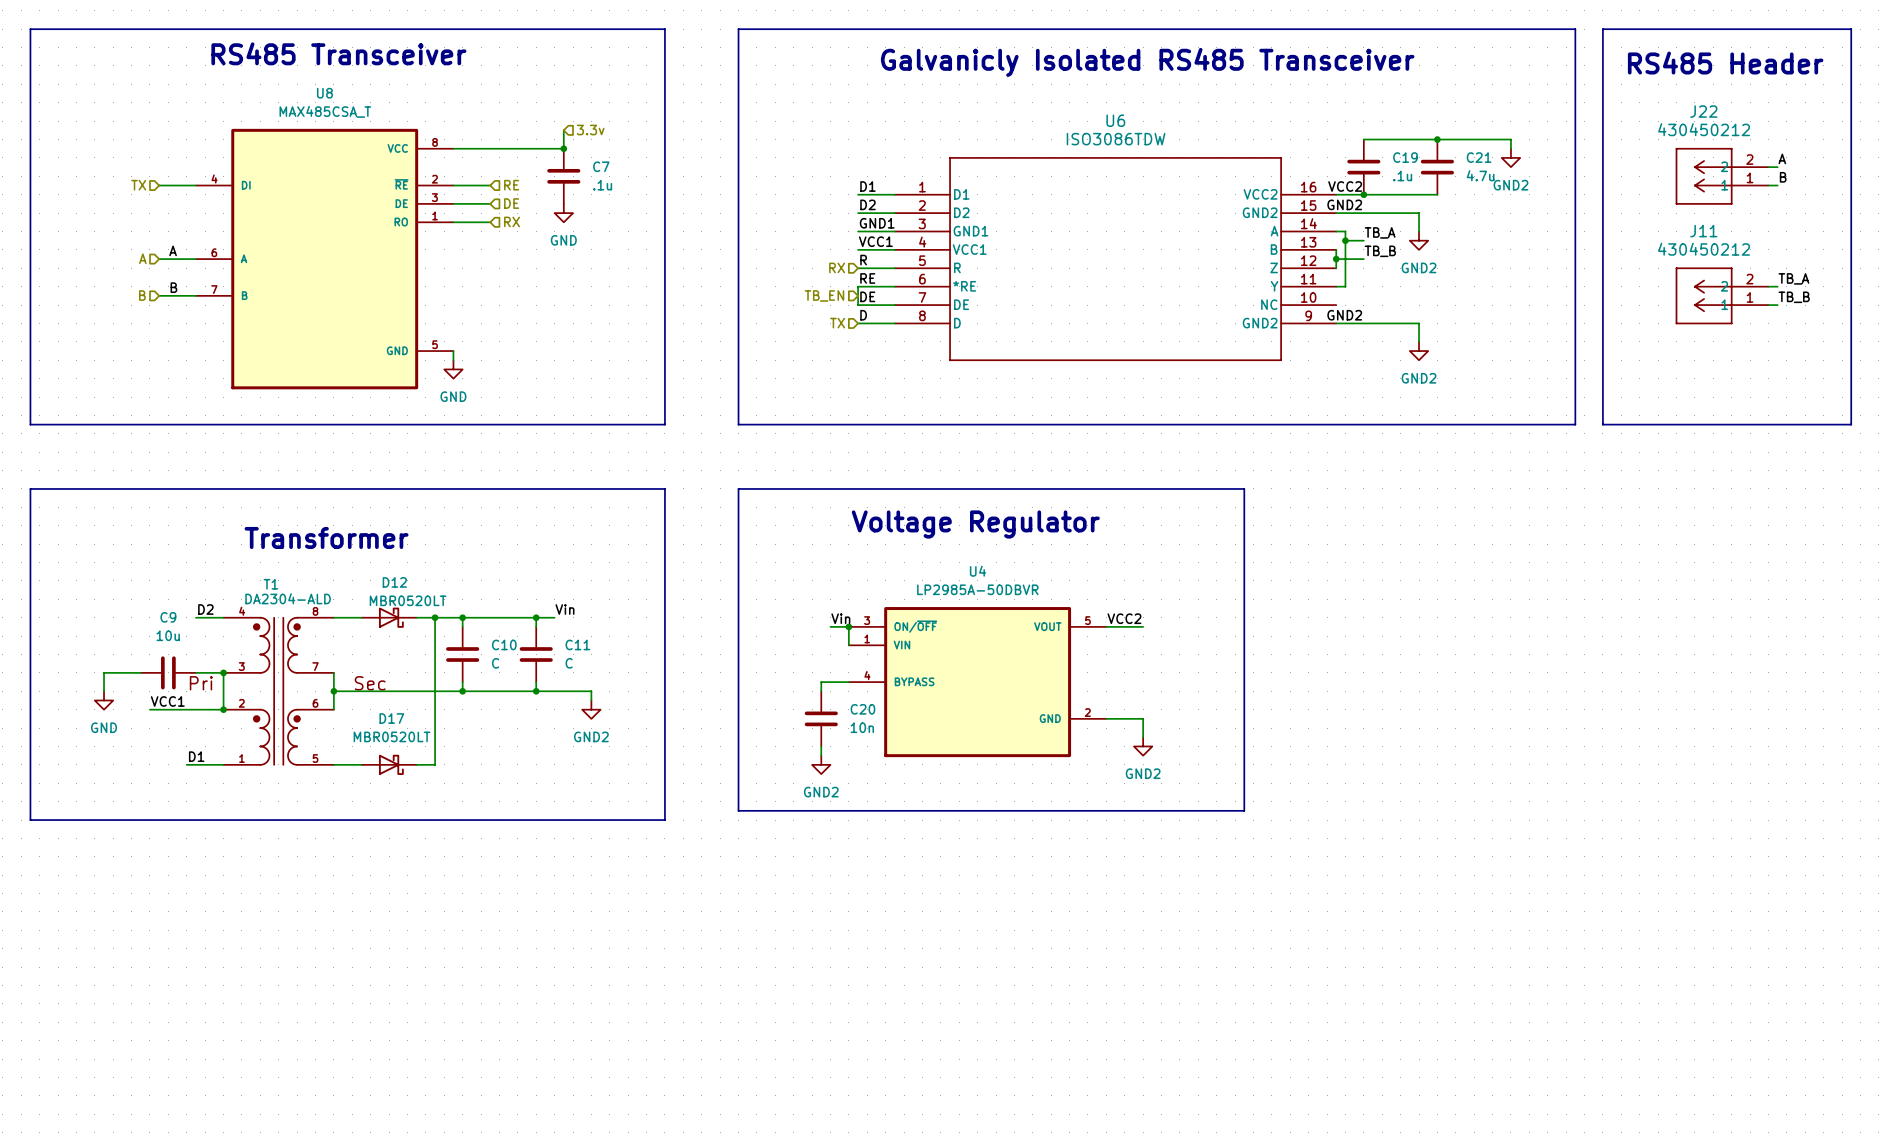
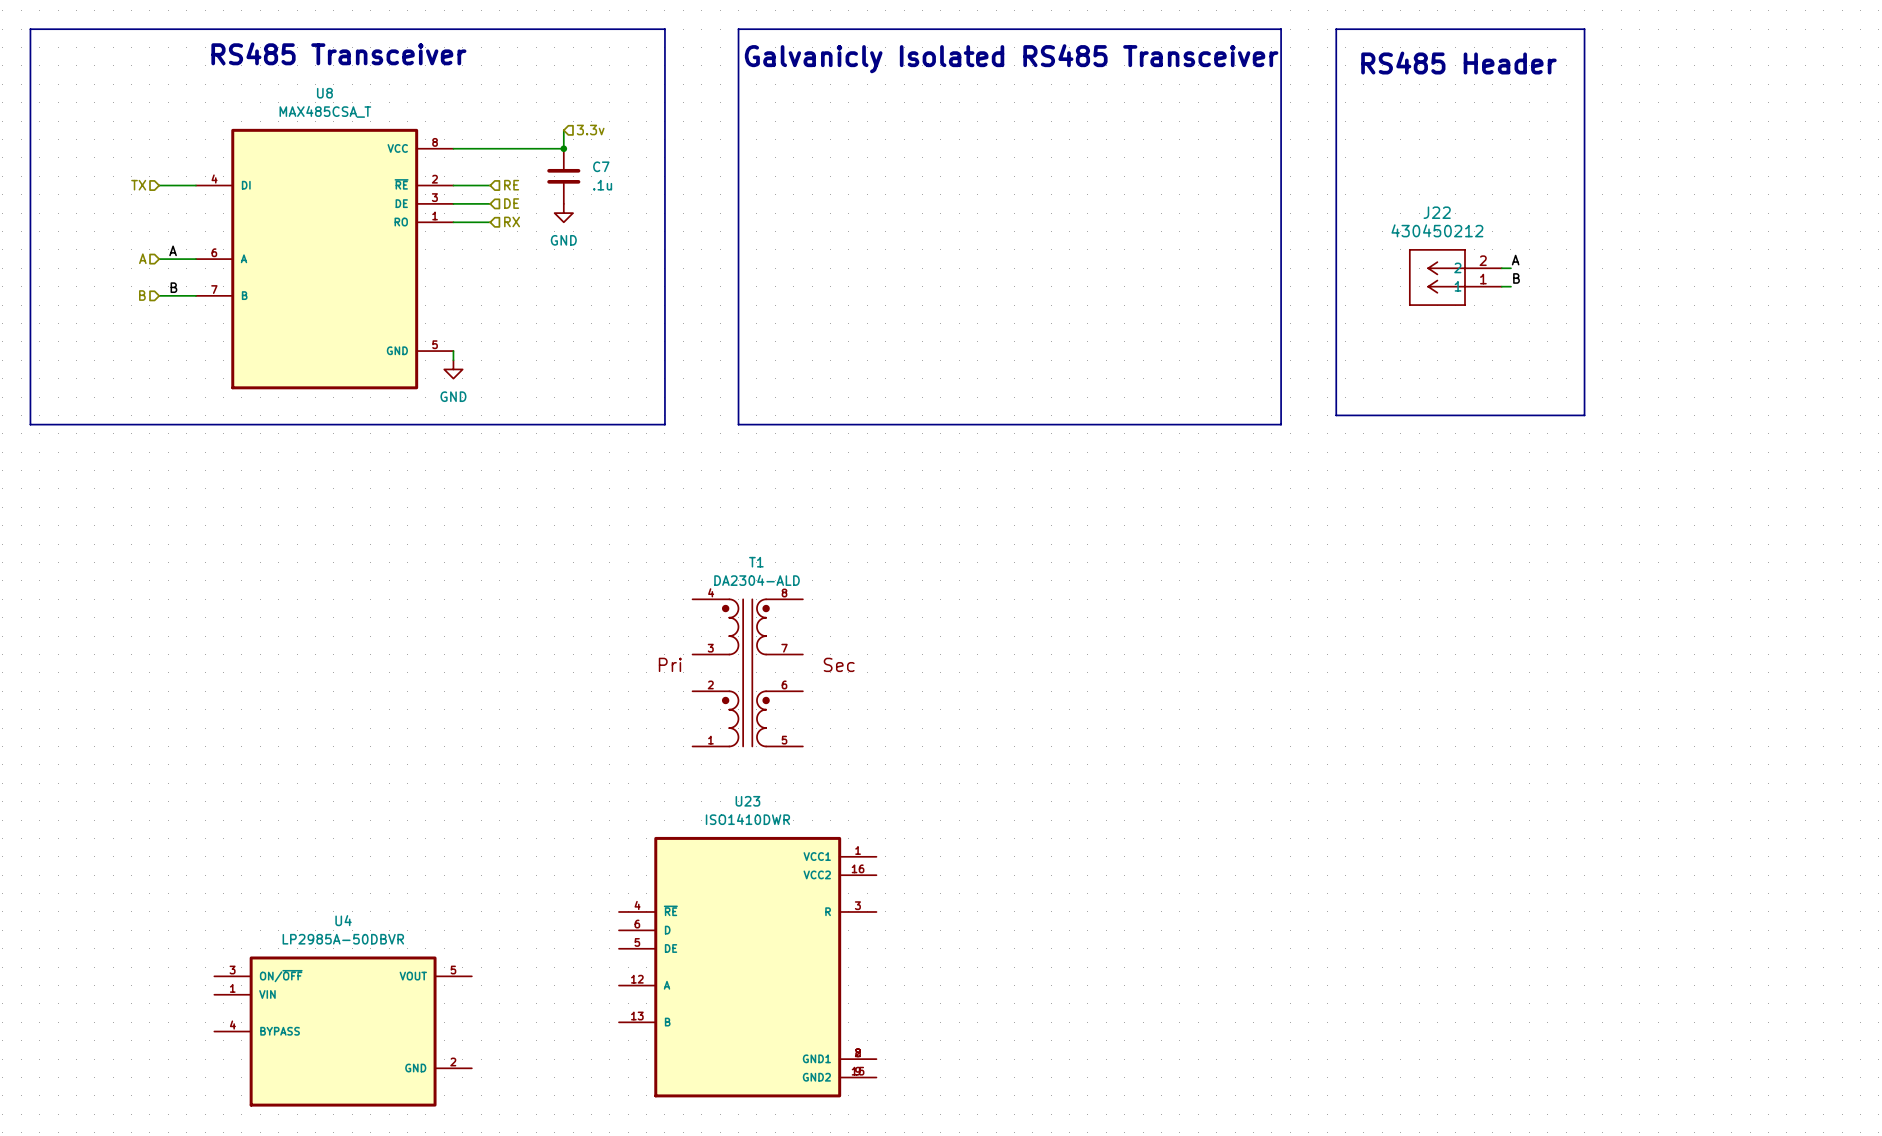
line: (1281, 29) (1336, 29) -> (1575, 29) (1584, 29) (1584, 415) (1336, 415) (1336, 29)
line: (1575, 29) (1575, 424) (1281, 424) -> (1281, 29) (1281, 424)
line: (1602, 29) (1851, 29) (1851, 424) (1602, 424) (1602, 29) -> none
text position: Galvanicly Isolated RS485 Transceiver (1147, 62) -> Galvanicly Isolated RS485 Transceiver (1011, 58)
text: none -> RS485 Header (1458, 63)
text: RS485 Header (1725, 63) -> none
wire: (1363, 139) (1510, 139) (1510, 148) -> none
junction: (1437, 139) -> none
power symbol: GND2 (1510, 157) -> none
label: A (1782, 158) -> none
C19: .1u (1363, 167) -> none
C21: 4.7u (1437, 167) -> none
wire: (1768, 167) (1777, 167) -> none
J22 position: (1722, 176) -> (1455, 277)
label: B (1783, 177) -> none
wire: (1768, 185) (1777, 185) -> none
label: D1 (867, 186) -> none
label: VCC2 (1345, 186) -> none
wire: (858, 194) (894, 194) -> none
wire: (1336, 194) (1437, 194) -> none
junction: (1363, 194) -> none
label: D2 (867, 204) -> none
label: GND2 (1344, 204) -> none
wire: (858, 213) (894, 213) -> none
wire: (1336, 213) (1419, 213) (1419, 231) -> none
label: GND1 (877, 223) -> none
wire: (858, 231) (894, 231) -> none
wire: (1336, 231) (1345, 231) (1345, 286) (1336, 286) -> none
label: TB_A (1380, 232) -> none
wire: (1345, 240) (1363, 240) -> none
junction: (1345, 240) -> none
power symbol: GND2 (1419, 240) -> none
label: VCC1 (875, 241) -> none
wire: (858, 249) (894, 249) -> none
label: TB_B (1380, 251) -> none
U6: ISO3086TDW (1115, 259) -> none
wire: (1336, 259) (1363, 259) -> none
junction: (1336, 259) -> none
label: R (863, 260) -> none
label: none -> A (1515, 260)
hierarchical label: RX (837, 267) -> none
wire: (858, 268) (894, 268) -> none
wire: none -> (1501, 268) (1510, 268)
label: RE (867, 278) -> none
label: none -> B (1516, 278)
label: TB_A (1793, 278) -> none
wire: (894, 286) (858, 286) (858, 305) (894, 305) -> none
wire: none -> (1501, 286) (1510, 286)
wire: (1768, 286) (1777, 286) -> none
hierarchical label: TB_EN (824, 295) -> none
J11: 430450212 (1722, 295) -> none
label: DE (867, 296) -> none
label: TB_B (1794, 297) -> none
wire: (1768, 305) (1777, 305) -> none
label: D (863, 315) -> none
label: GND2 (1344, 315) -> none
hierarchical label: TX (837, 323) -> none
wire: (858, 323) (894, 323) -> none
wire: (1336, 323) (1419, 323) (1419, 341) -> none
power symbol: GND2 (1419, 351) -> none
line: (30, 488) (664, 488) (664, 820) (30, 820) (30, 488) -> none
line: (738, 488) (1244, 488) (1244, 810) (738, 810) (738, 488) -> none
text: Voltage Regulator (975, 524) -> none
text: Transformer (326, 537) -> none
T1 name position: T1 (270, 584) -> T1 (756, 562)
label: D2 (205, 609) -> none
label: Vin (564, 609) -> none
wire: (195, 617) (223, 617) -> none
wire: (333, 617) (361, 617) -> none
D12: MBR0520LT (389, 617) -> none
wire: (416, 617) (554, 617) -> none
wire: (435, 617) (435, 764) (416, 764) -> none
junction: (435, 617) -> none
wire: (462, 617) (462, 626) -> none
junction: (462, 617) -> none
wire: (536, 617) (536, 626) -> none
junction: (536, 617) -> none
label: Vin (840, 618) -> none
label: VCC2 (1124, 618) -> none
wire: (830, 626) (848, 626) (848, 645) -> none
junction: (848, 626) -> none
wire: (1106, 626) (1143, 626) -> none
C10: C (462, 654) -> none
C11: C (536, 654) -> none
wire: (140, 672) (104, 672) (104, 691) -> none
C9: 10u (168, 672) -> none
wire: (195, 672) (223, 672) (223, 709) (149, 709) -> none
junction: (223, 672) -> none
wire: (333, 672) (333, 709) -> none
wire: (462, 682) (462, 691) -> none
wire: (536, 682) (536, 691) -> none
wire: (848, 682) (821, 682) (821, 691) -> none
U4 position: (977, 682) -> (343, 1031)
T1 position: (278, 691) -> (747, 672)
wire: (333, 691) (591, 691) (591, 700) -> none
junction: (333, 691) -> none
junction: (462, 691) -> none
junction: (536, 691) -> none
power symbol: GND (104, 700) -> none
label: VCC1 (167, 701) -> none
junction: (223, 709) -> none
power symbol: GND2 (591, 709) -> none
C20: 10n (821, 718) -> none
wire: (1106, 718) (1143, 718) (1143, 737) -> none
wire: (821, 746) (821, 755) -> none
power symbol: GND2 (1143, 746) -> none
label: D1 (196, 756) -> none
wire: (186, 764) (223, 764) -> none
wire: (333, 764) (361, 764) -> none
D17: MBR0520LT (389, 764) -> none
power symbol: GND2 (821, 764) -> none
U23: none -> ISO1410DWR (747, 967)

